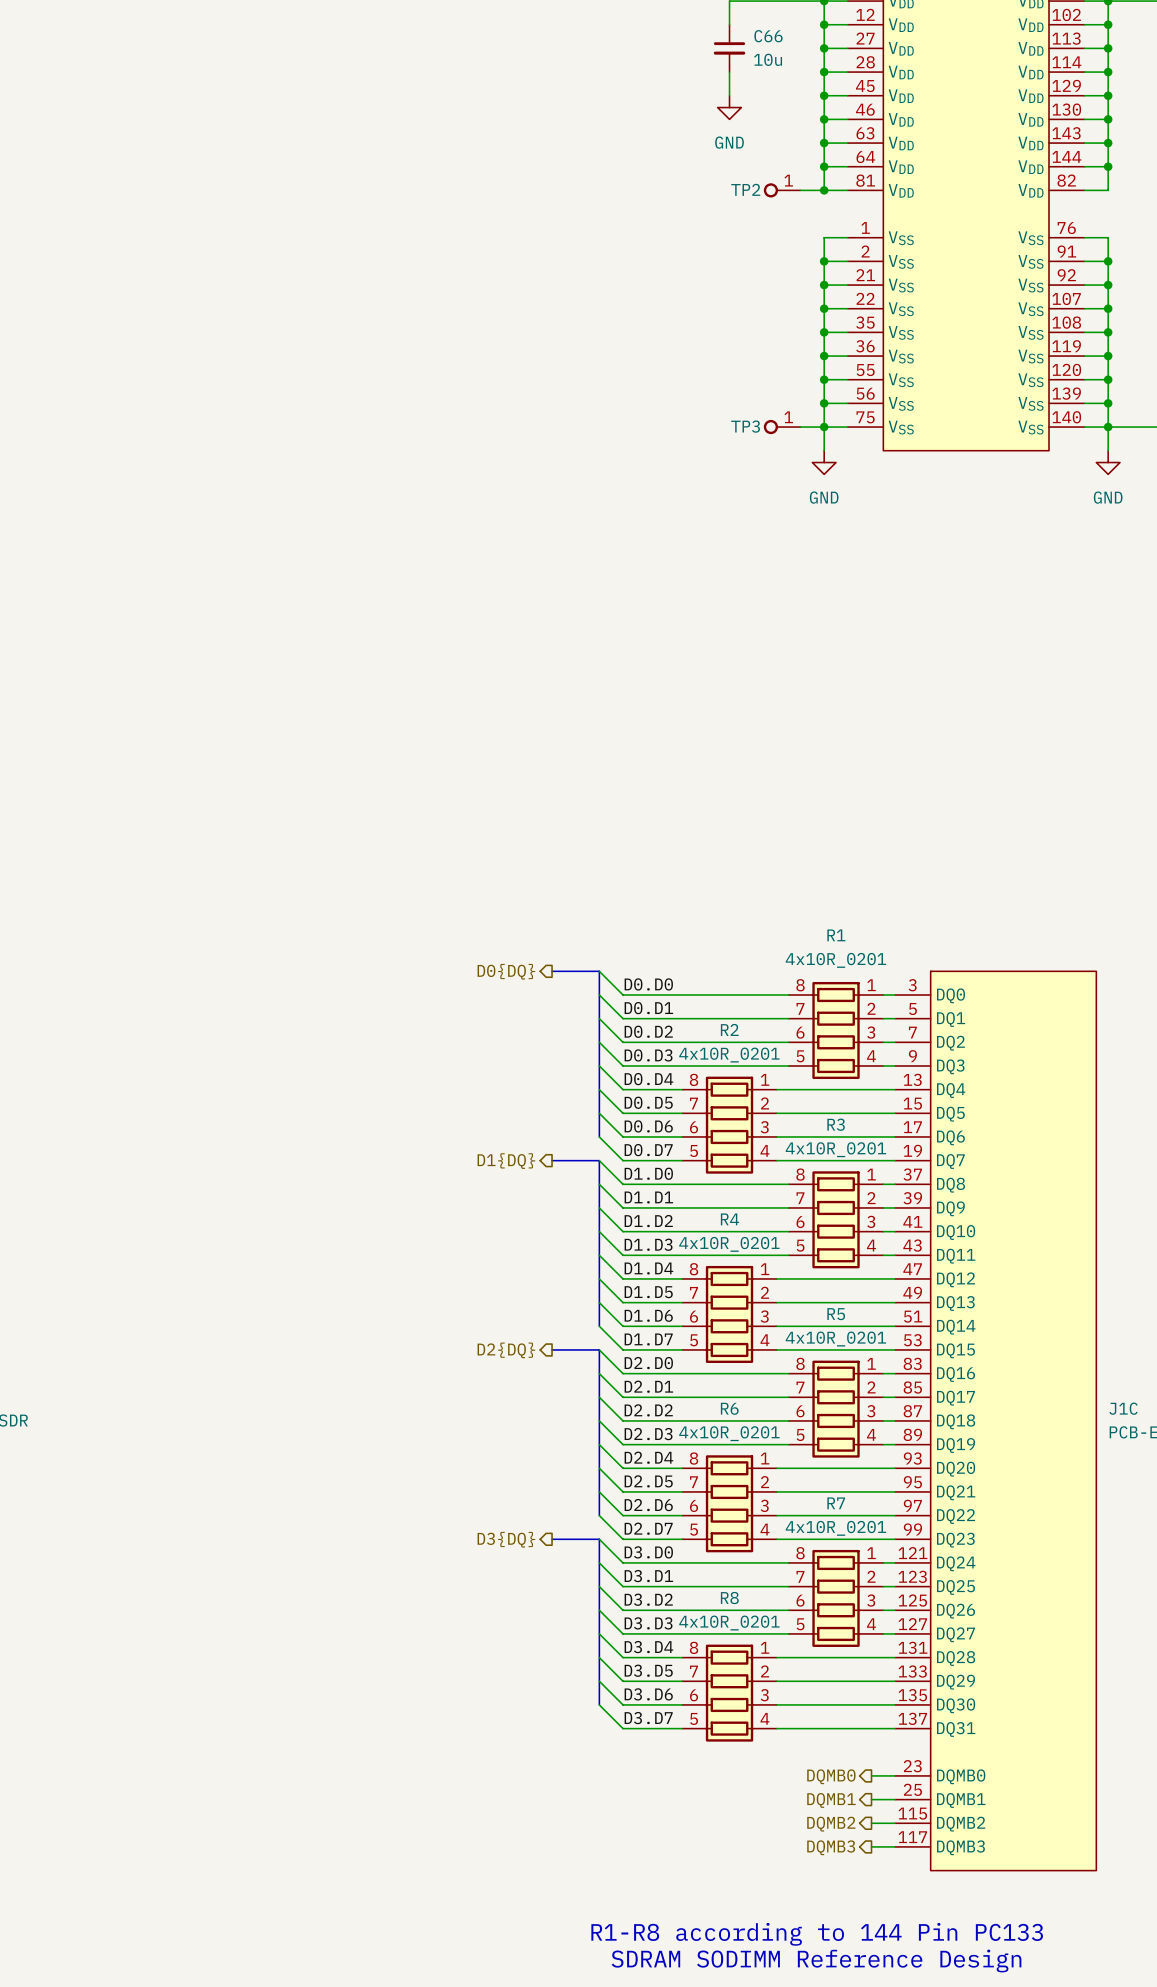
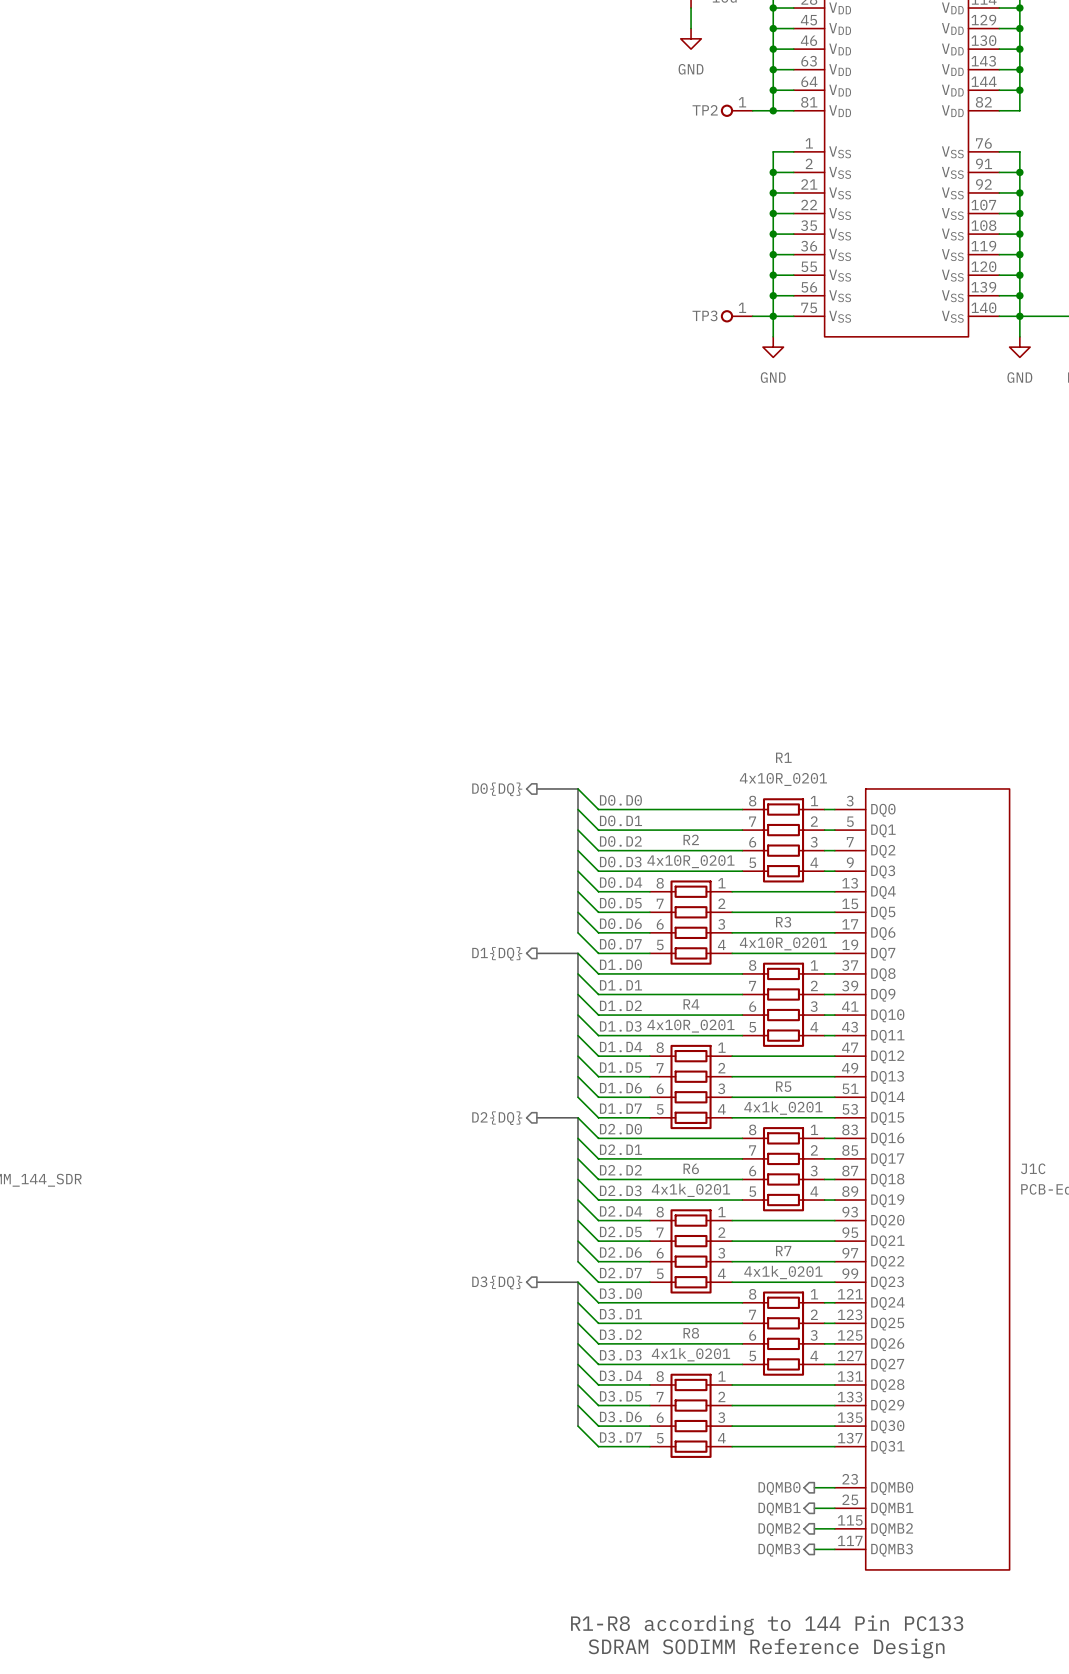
R5 text: 4x10R_0201 (835, 1339) -> 4x1k_0201 (783, 1108)
R6 text: 4x10R_0201 (729, 1433) -> 4x1k_0201 (690, 1190)
R7 text: 4x10R_0201 (835, 1528) -> 4x1k_0201 (783, 1272)
R8 text: 4x10R_0201 (729, 1623) -> 4x1k_0201 (690, 1354)

